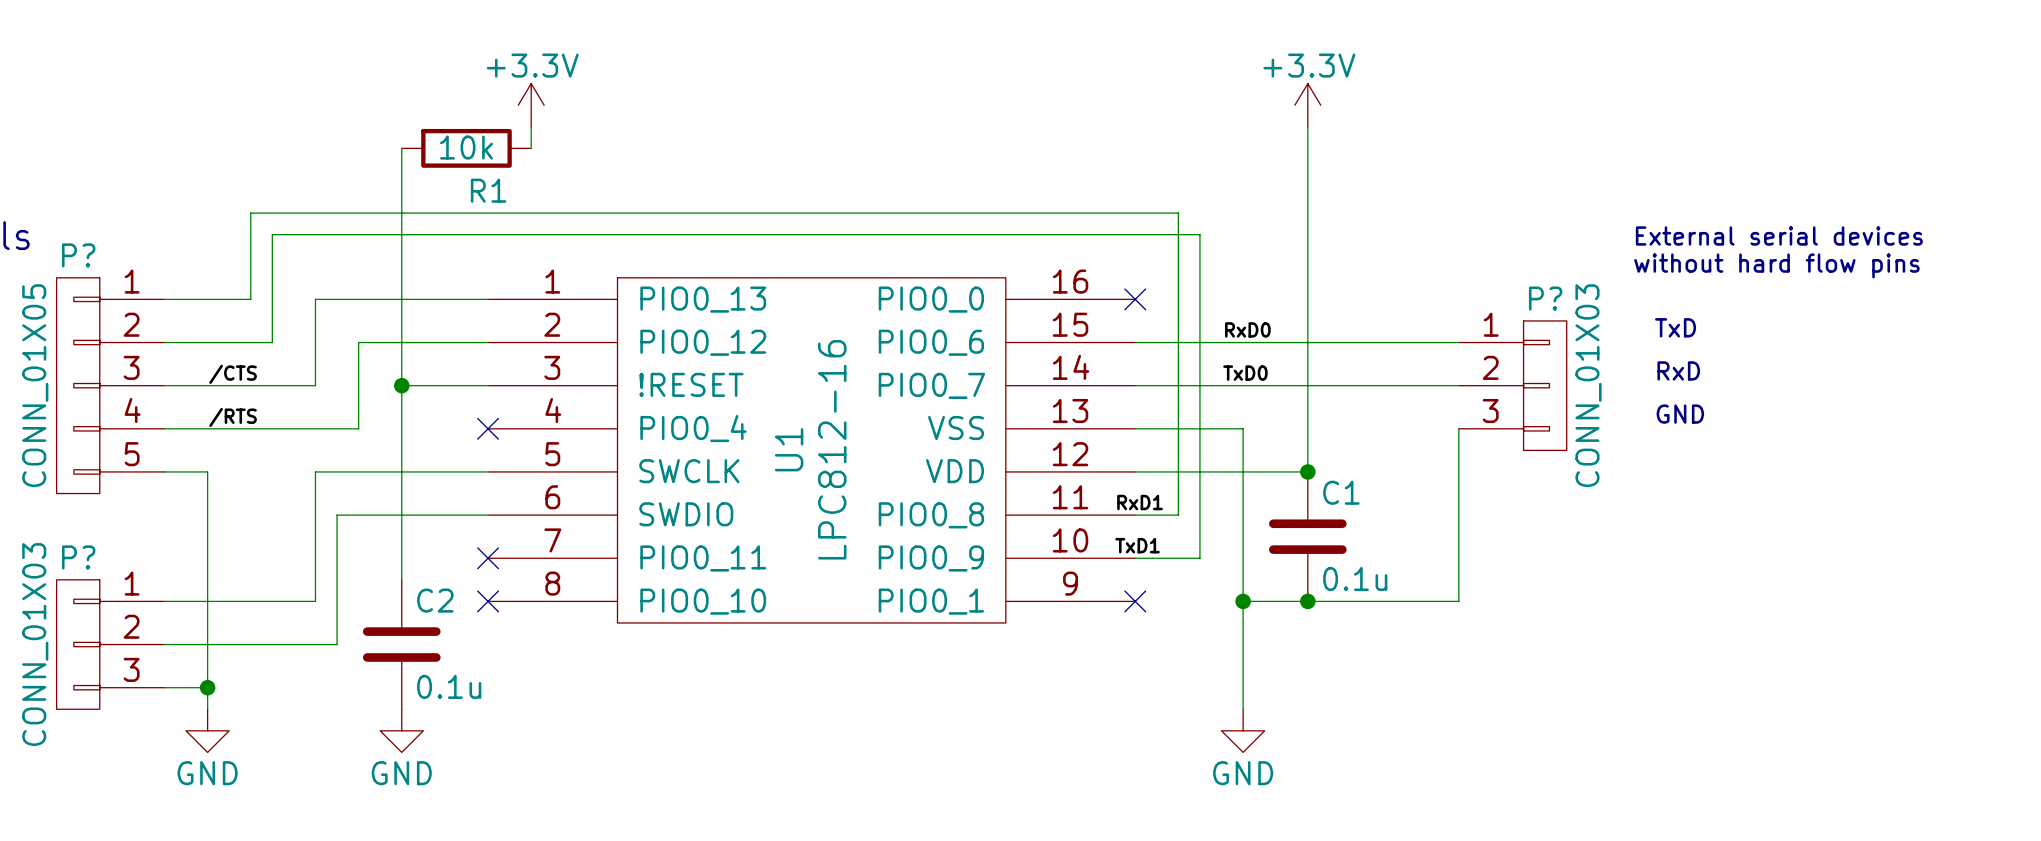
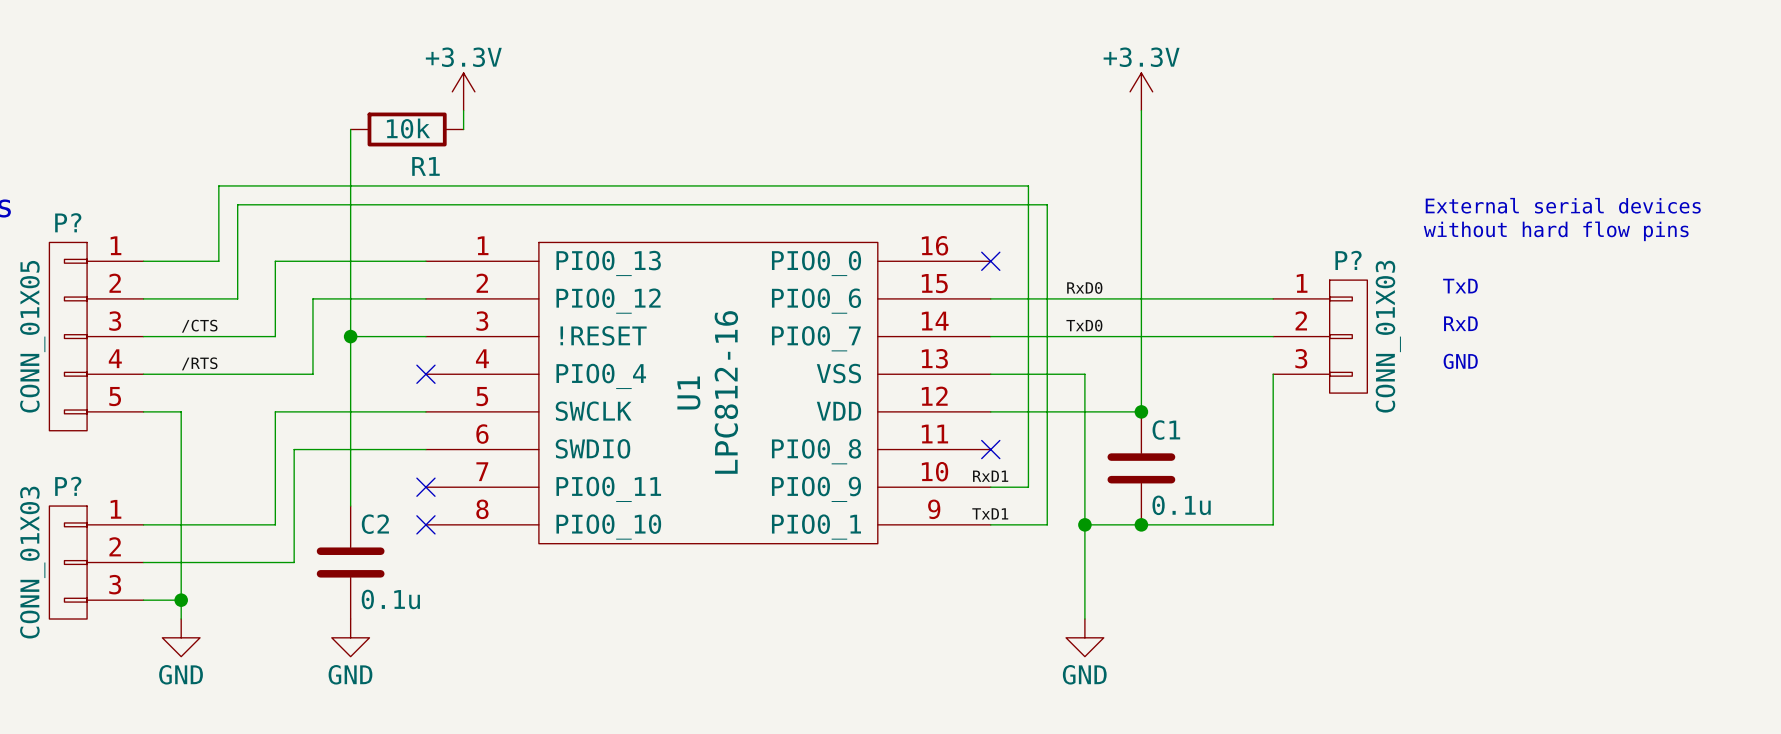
label: RxD1 (1140, 502) -> none
wire: (1135, 515) (1178, 515) -> none
label: TxD1 (1137, 545) -> RxD1 (990, 476)
wire: (1178, 558) (1199, 558) -> (1028, 487) (1028, 449)
wire: none -> (1047, 487) (1047, 524) (990, 524)
label: none -> TxD1 (990, 513)
no-connect mark position: (1135, 601) -> (990, 449)

